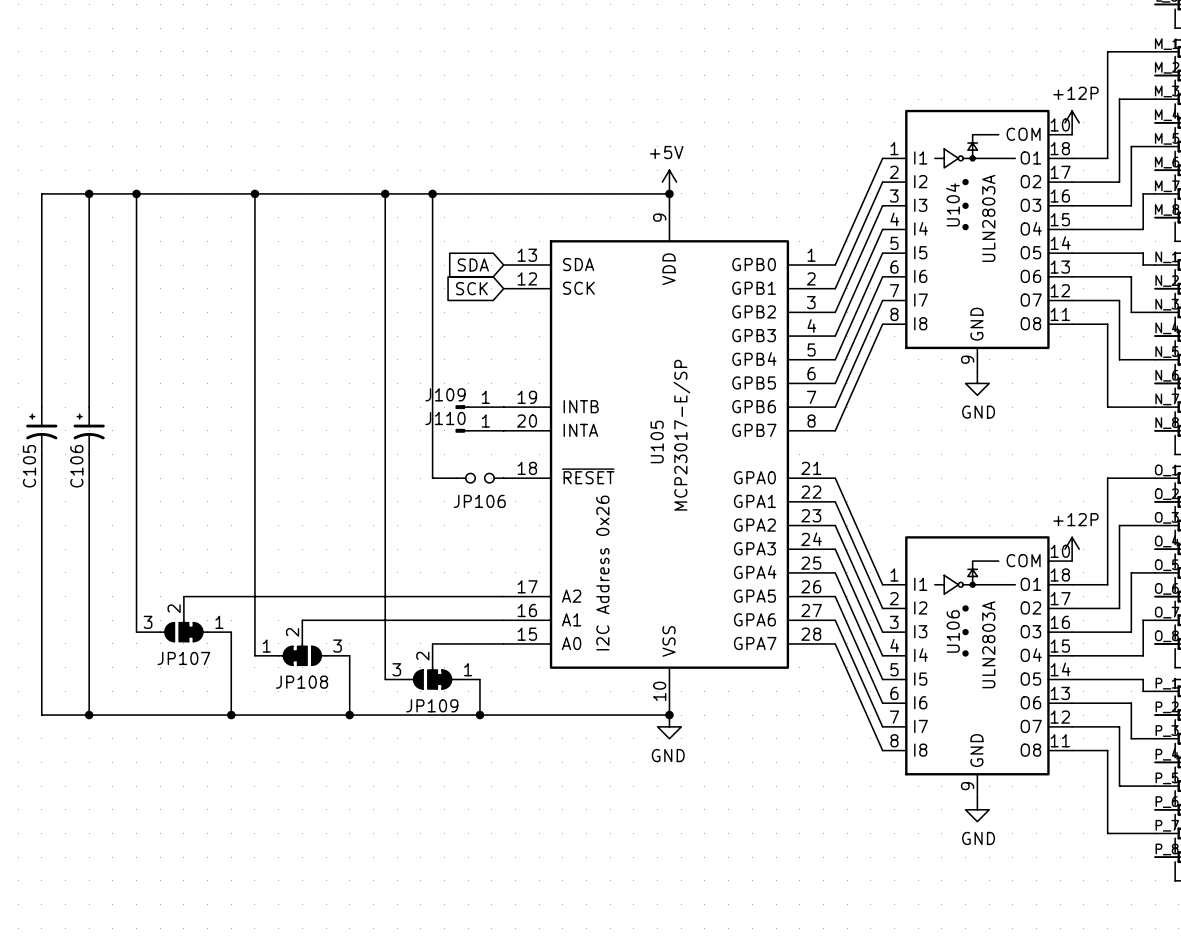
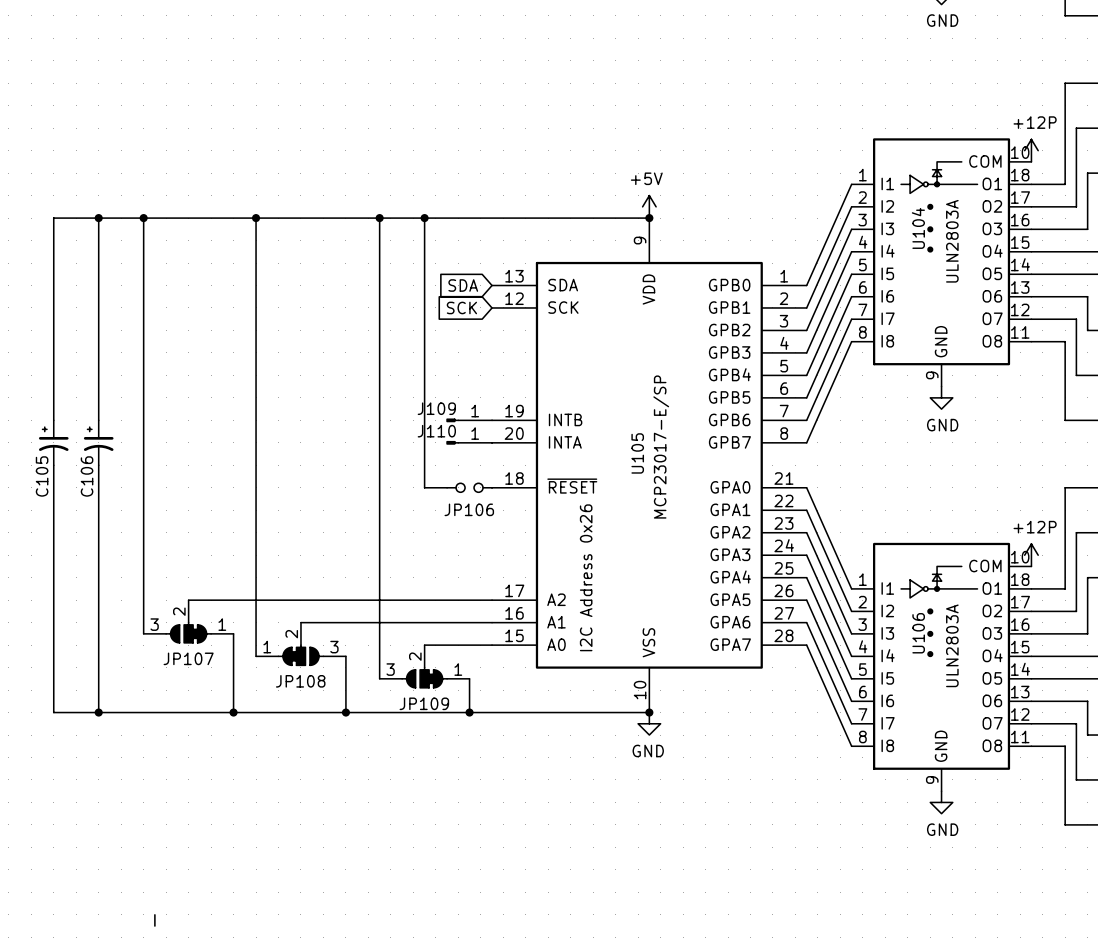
wire: none -> (154, 914) (154, 926)

